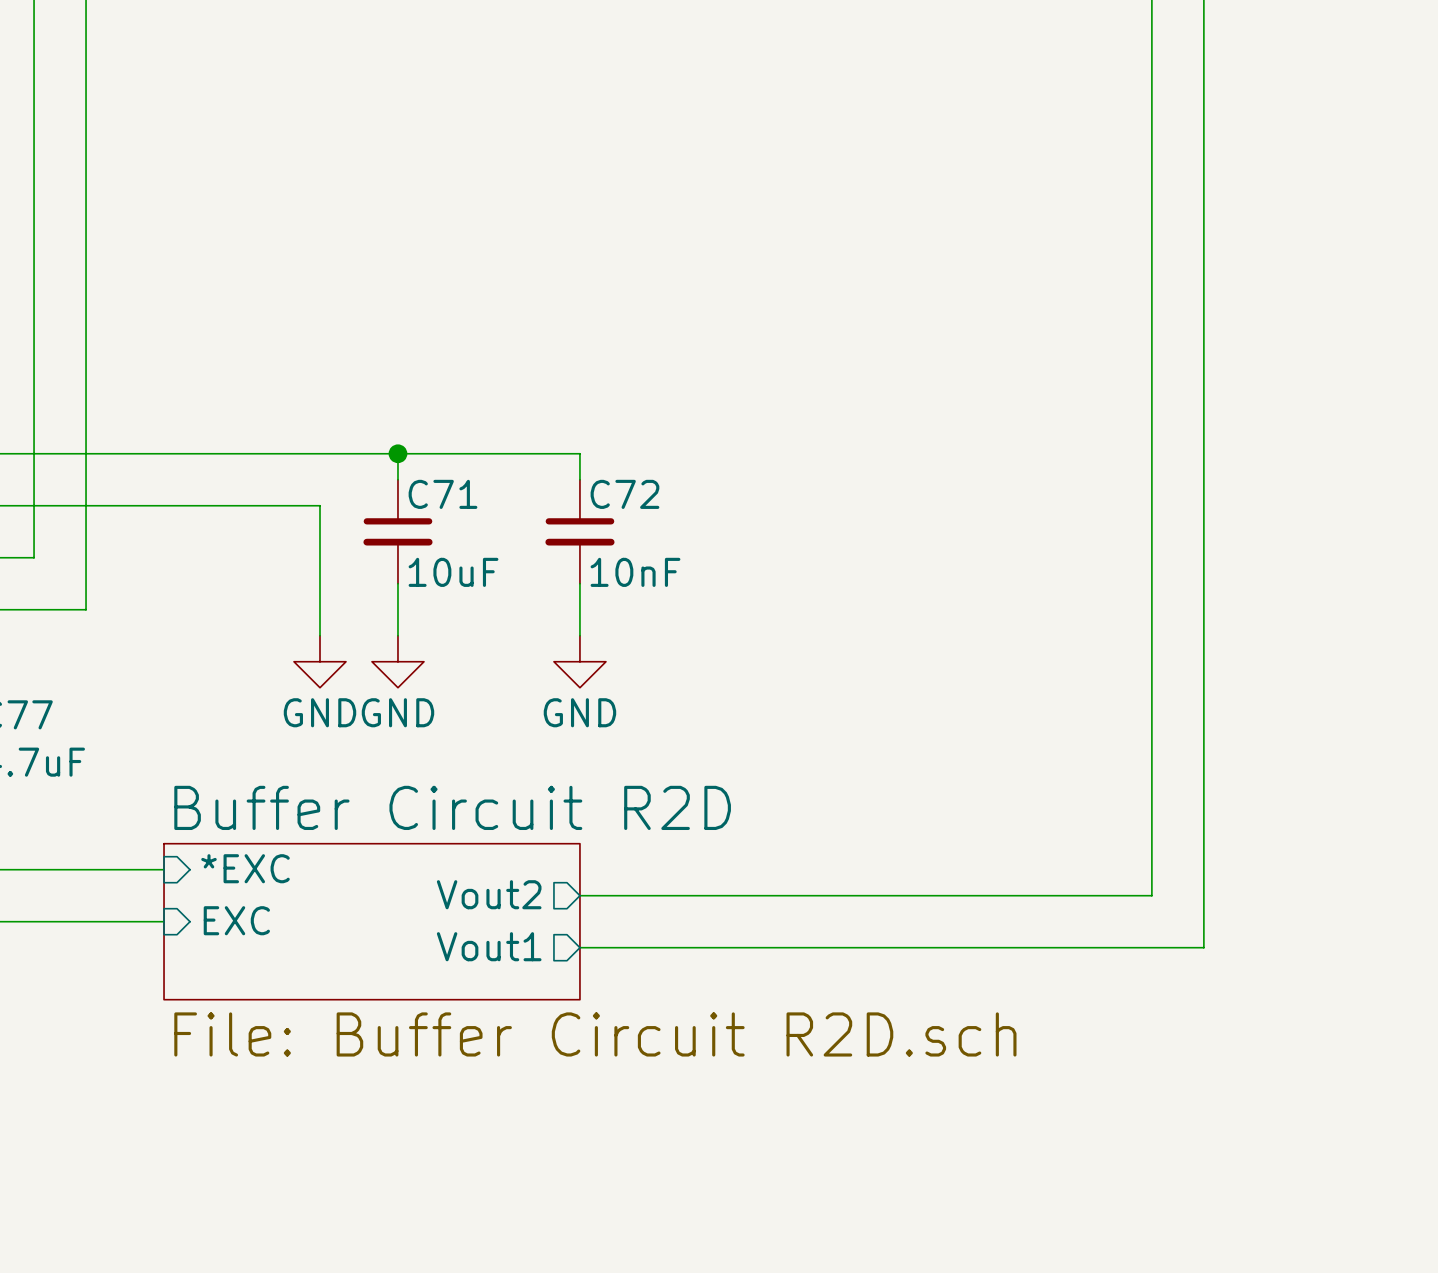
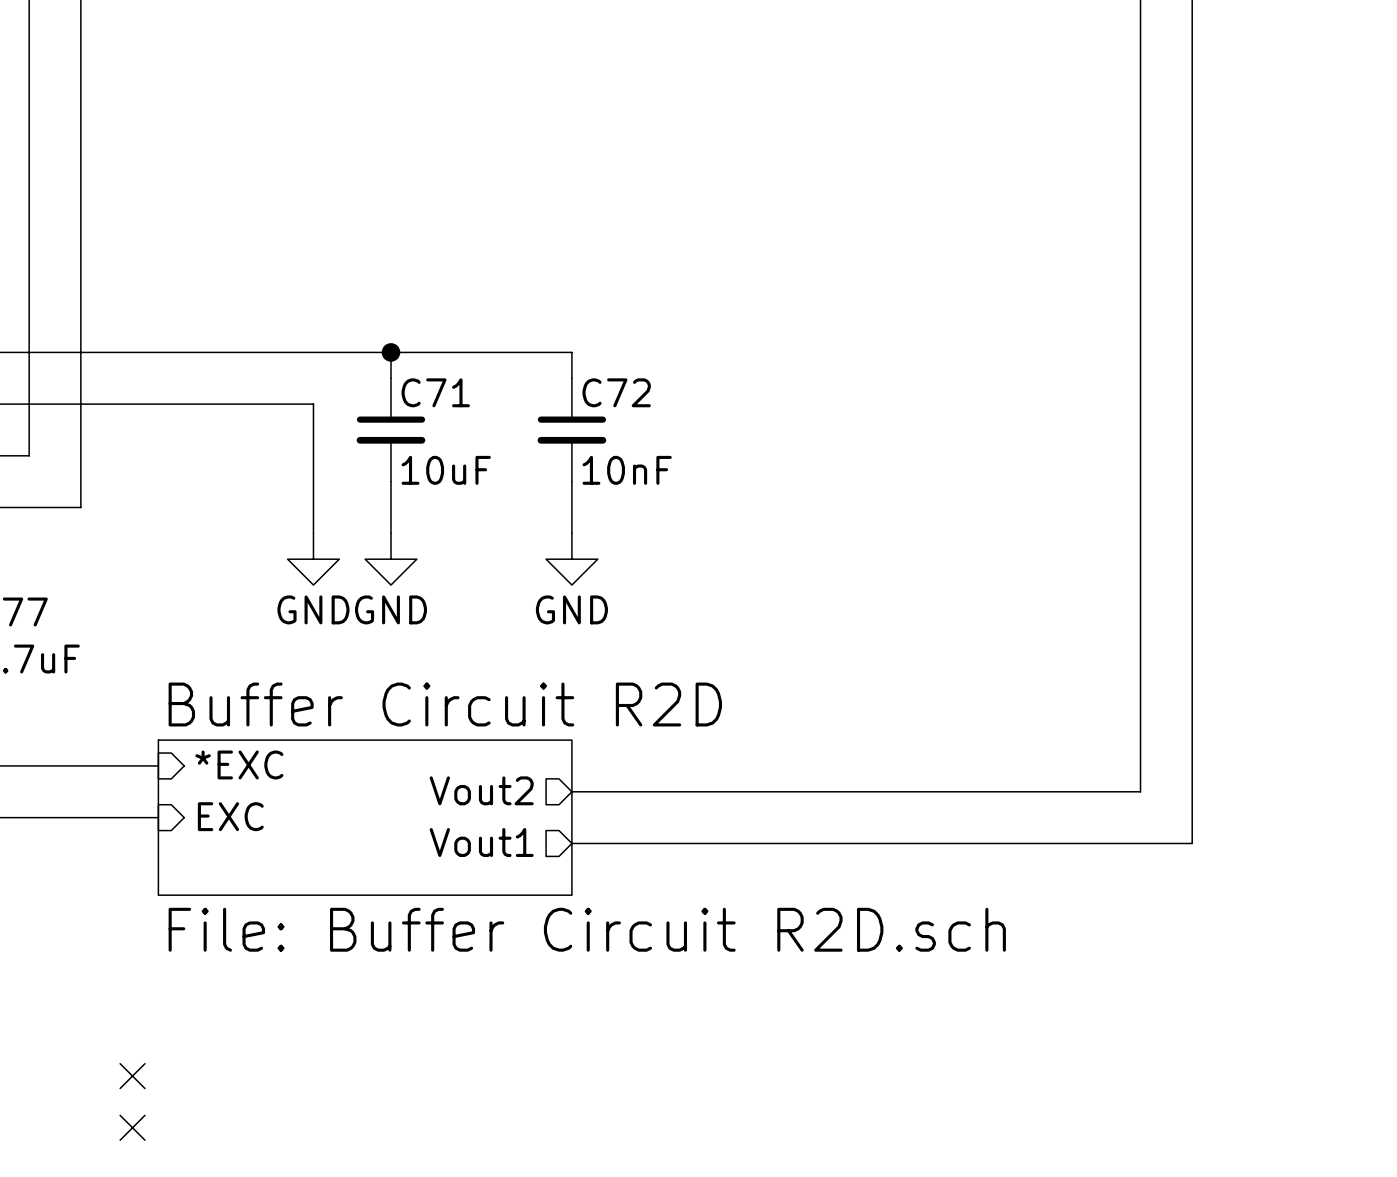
no-connect mark: none -> (132, 1076)
no-connect mark: none -> (132, 1127)

